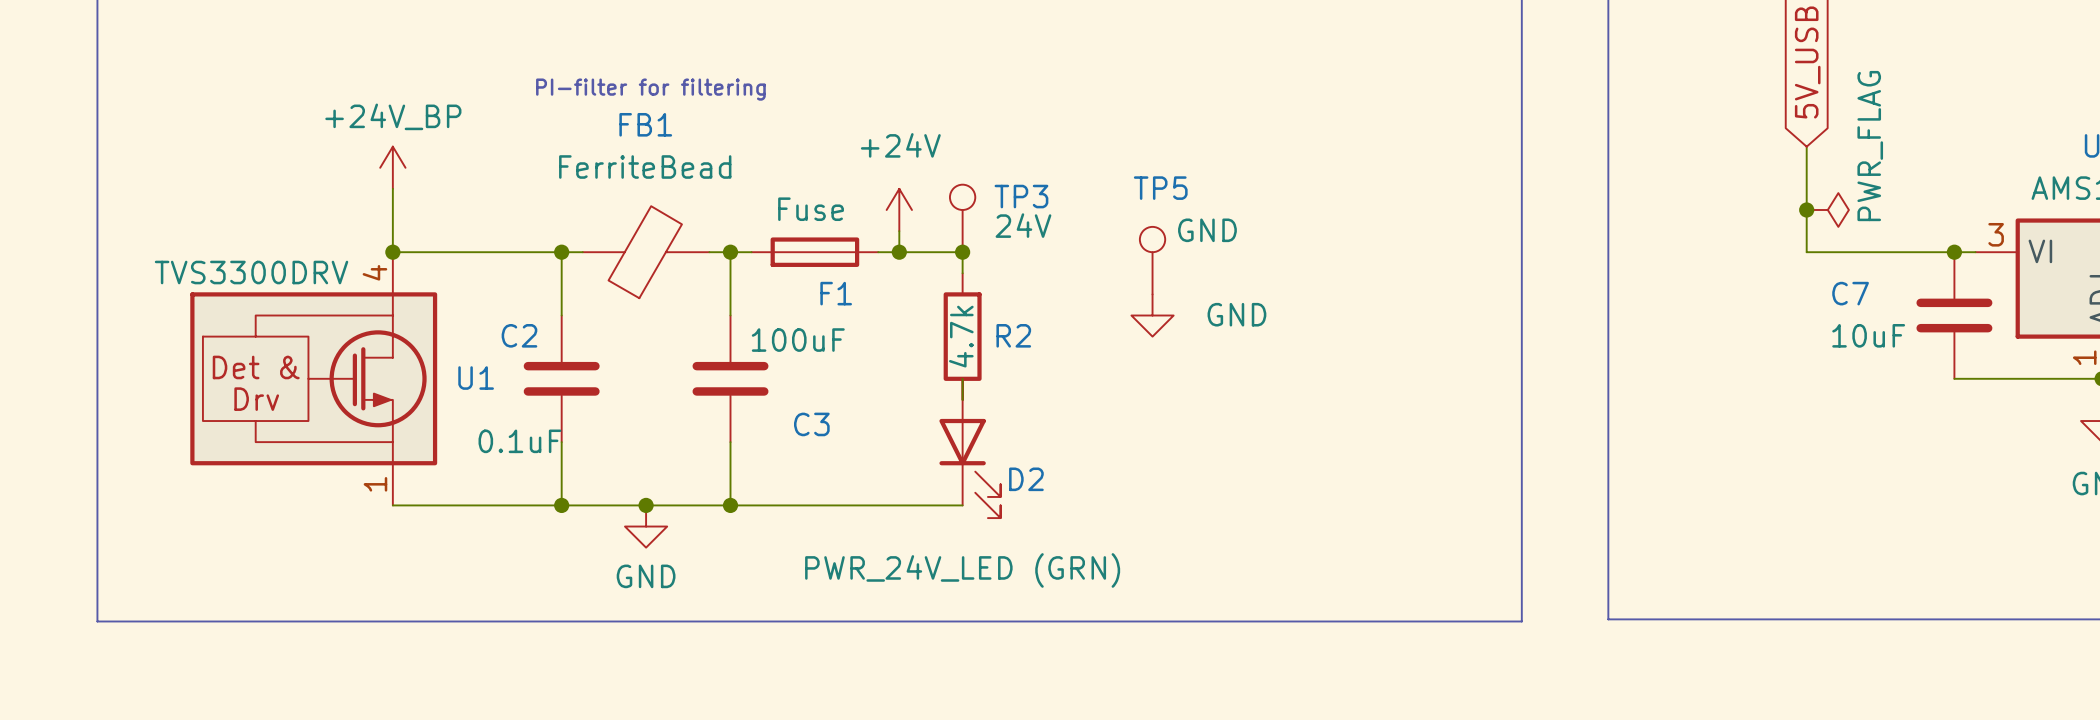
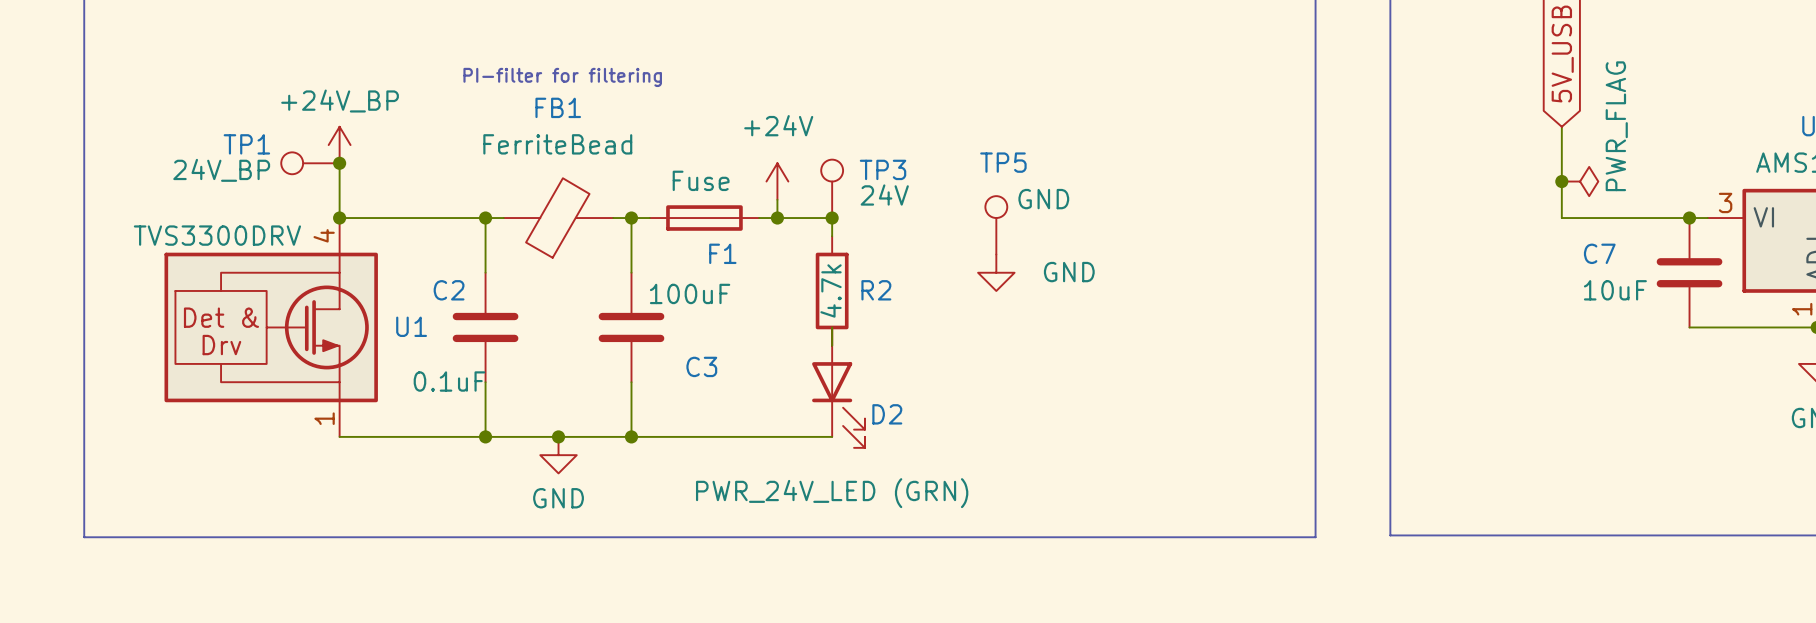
TP1: none -> 24V_BP (310, 163)
junction: none -> (339, 163)

